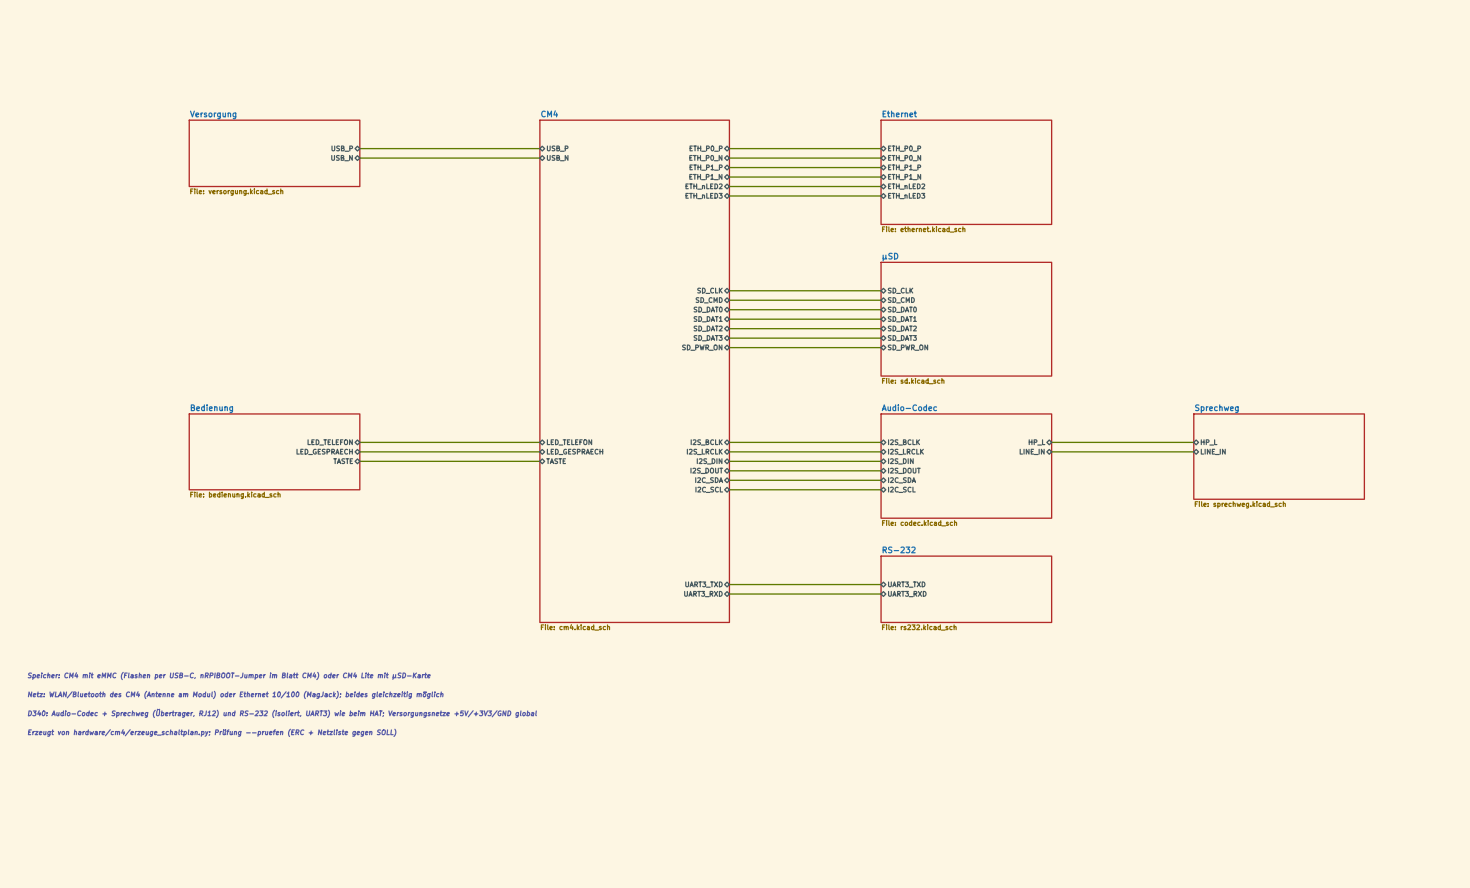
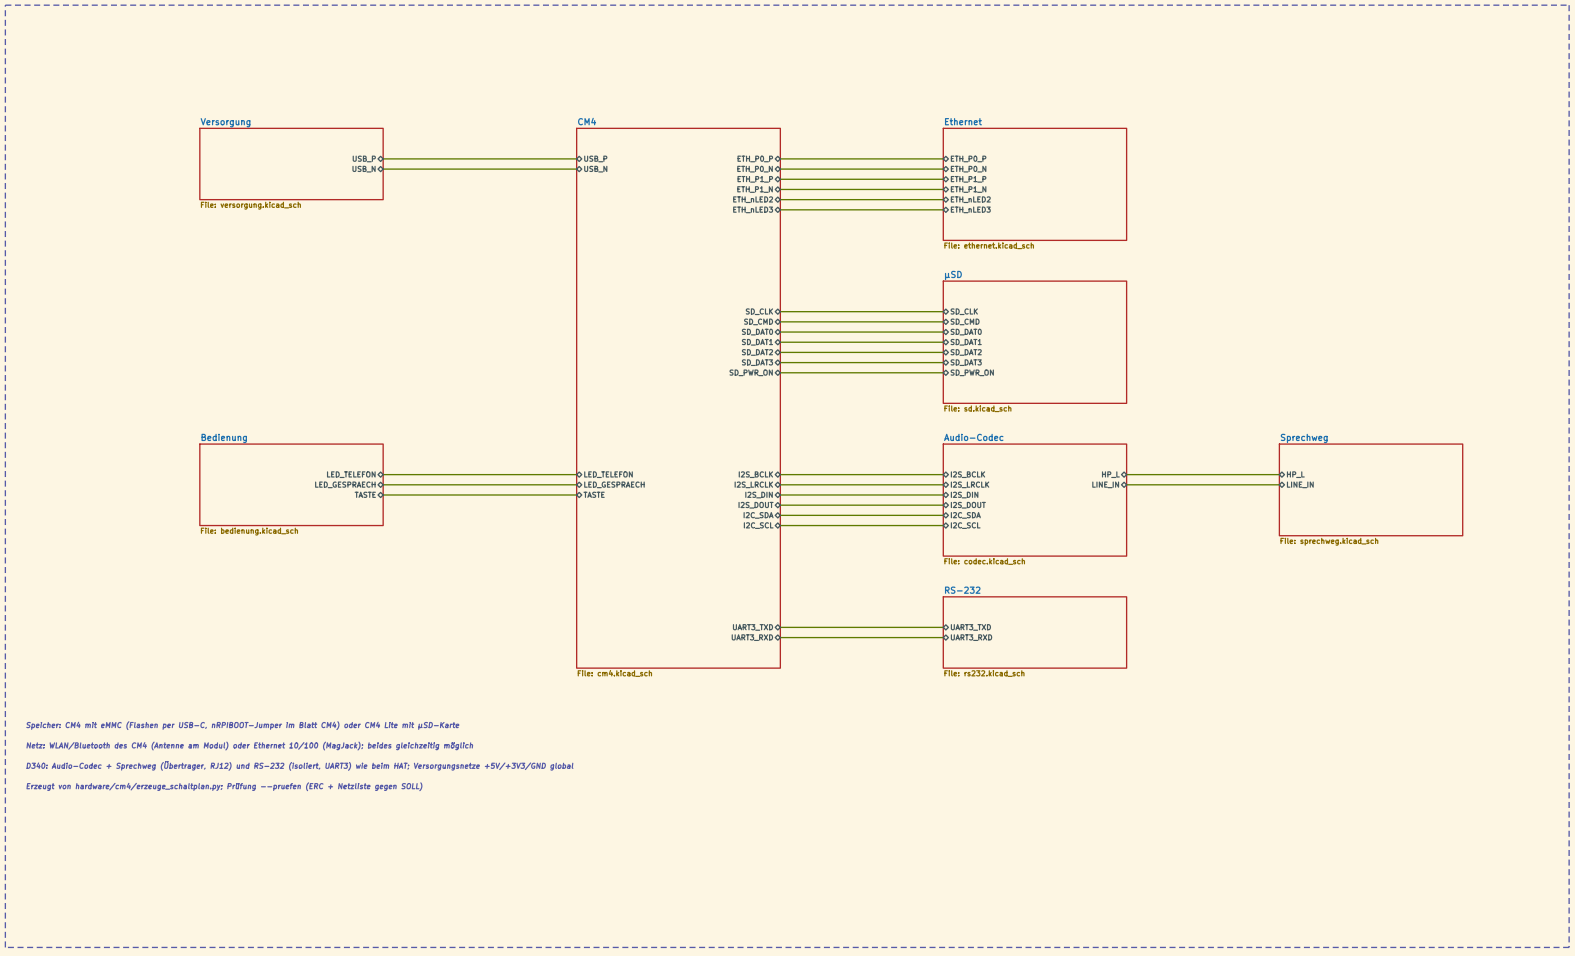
line: none -> (5, 5) (1569, 5) (1569, 947) (5, 947) (5, 5)

